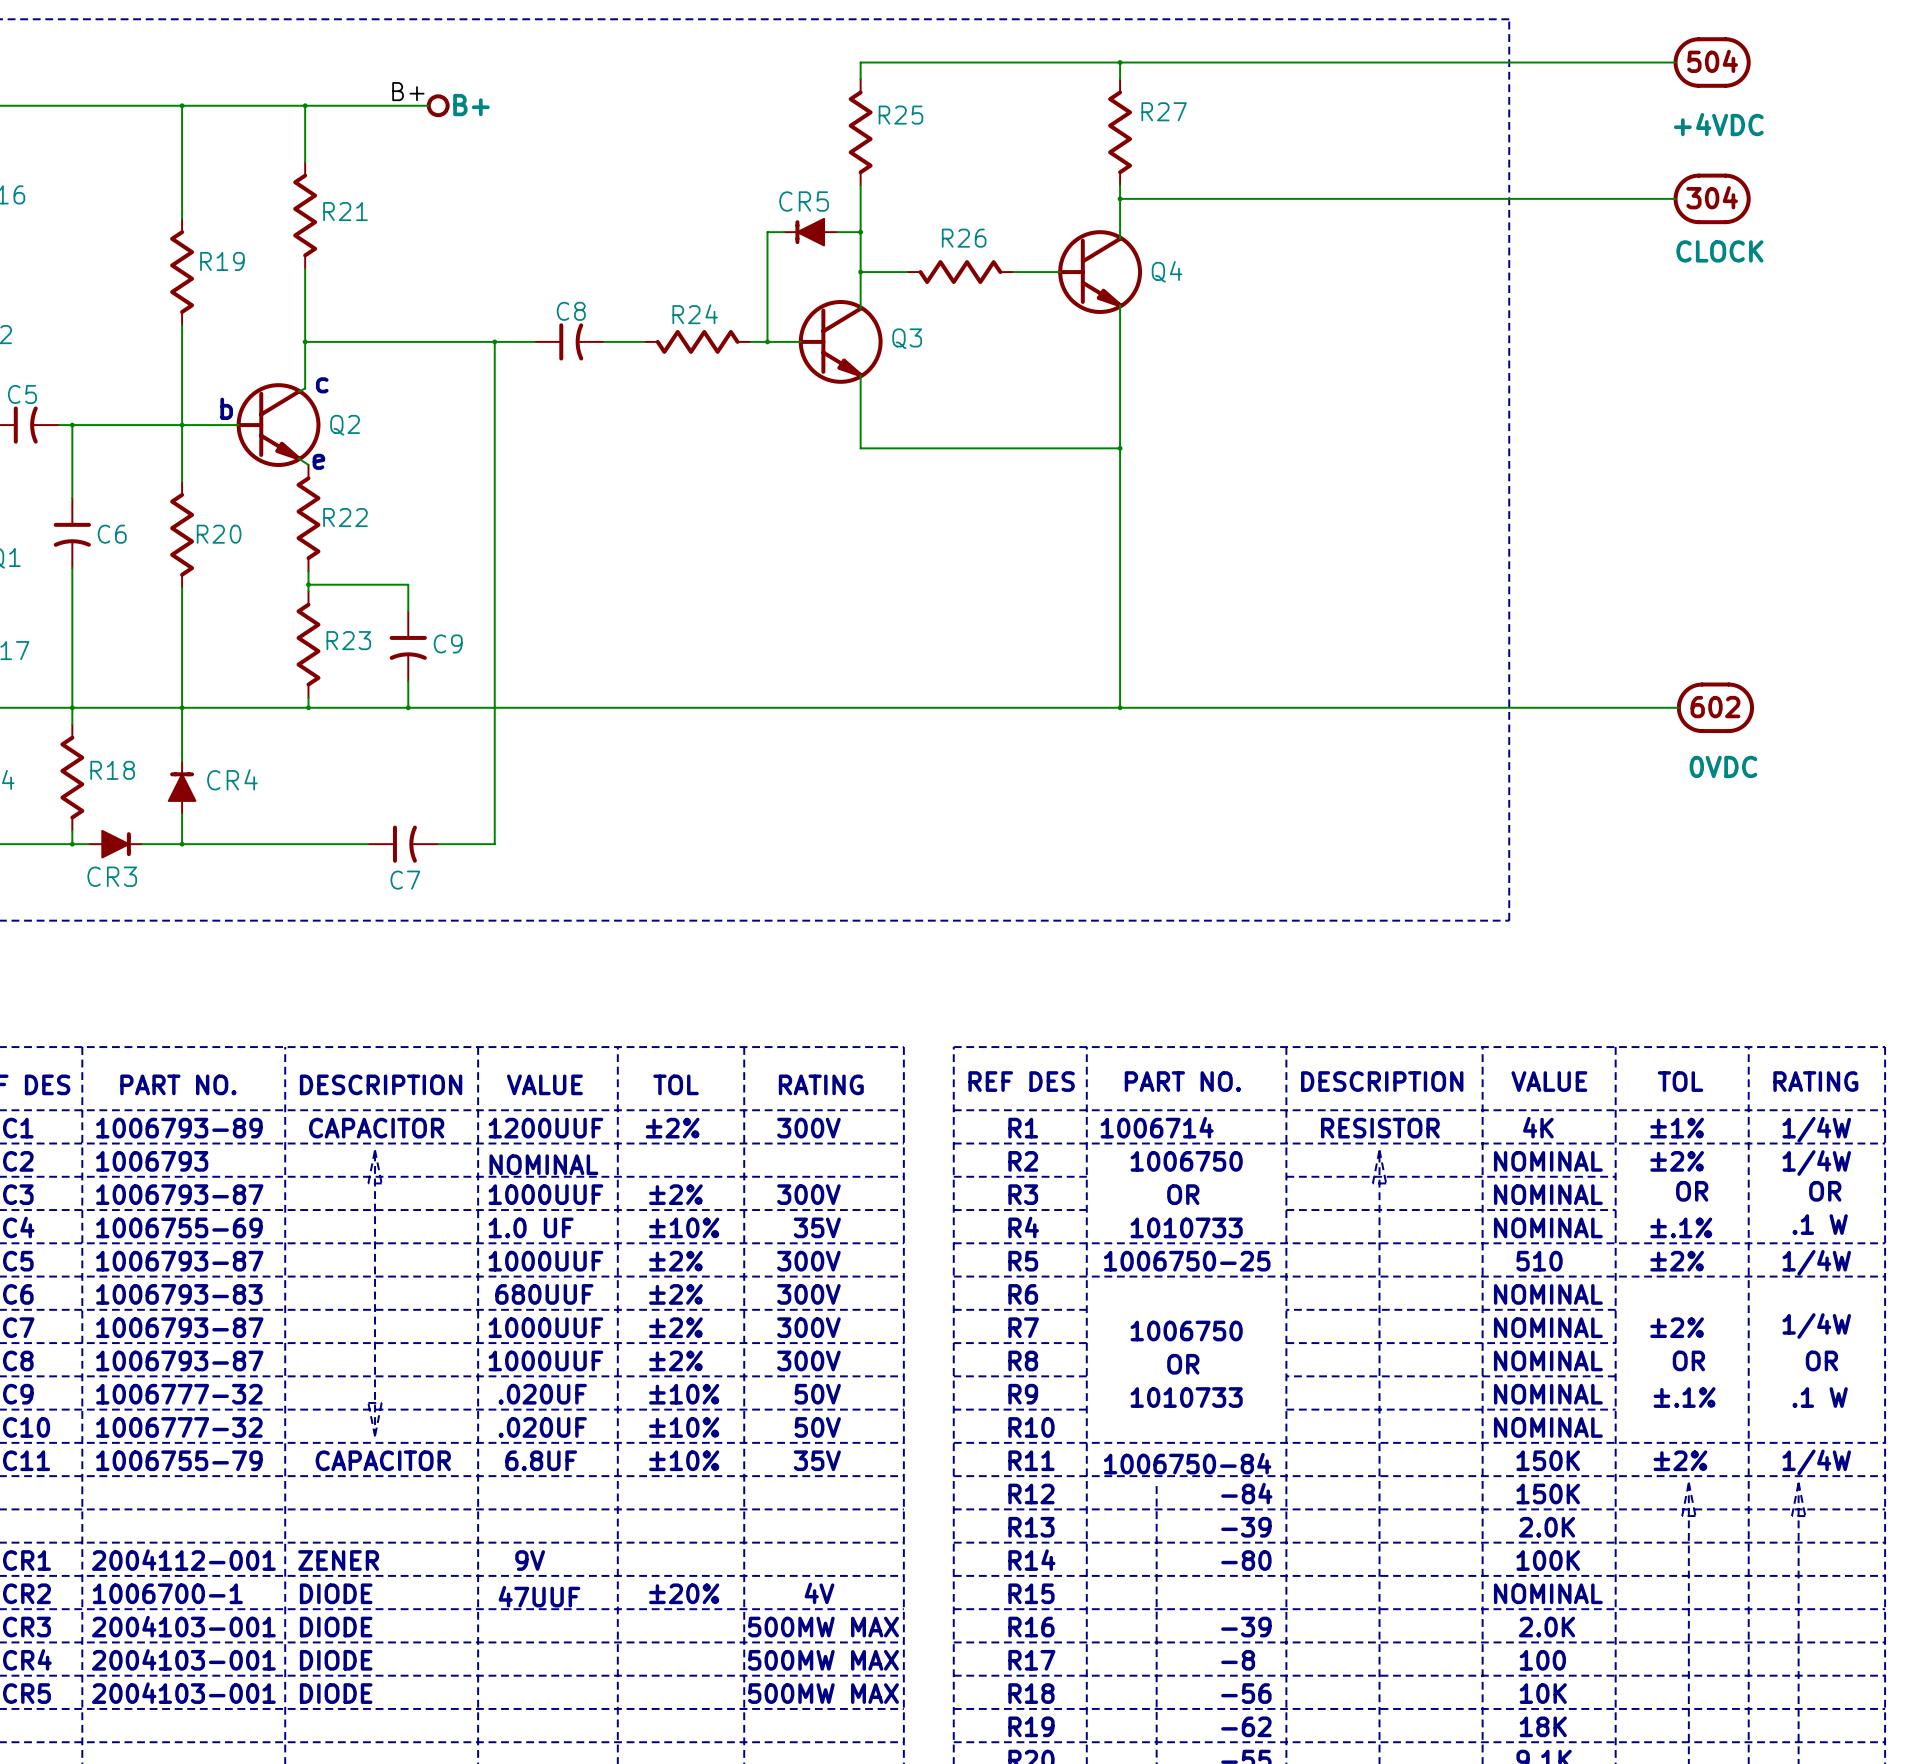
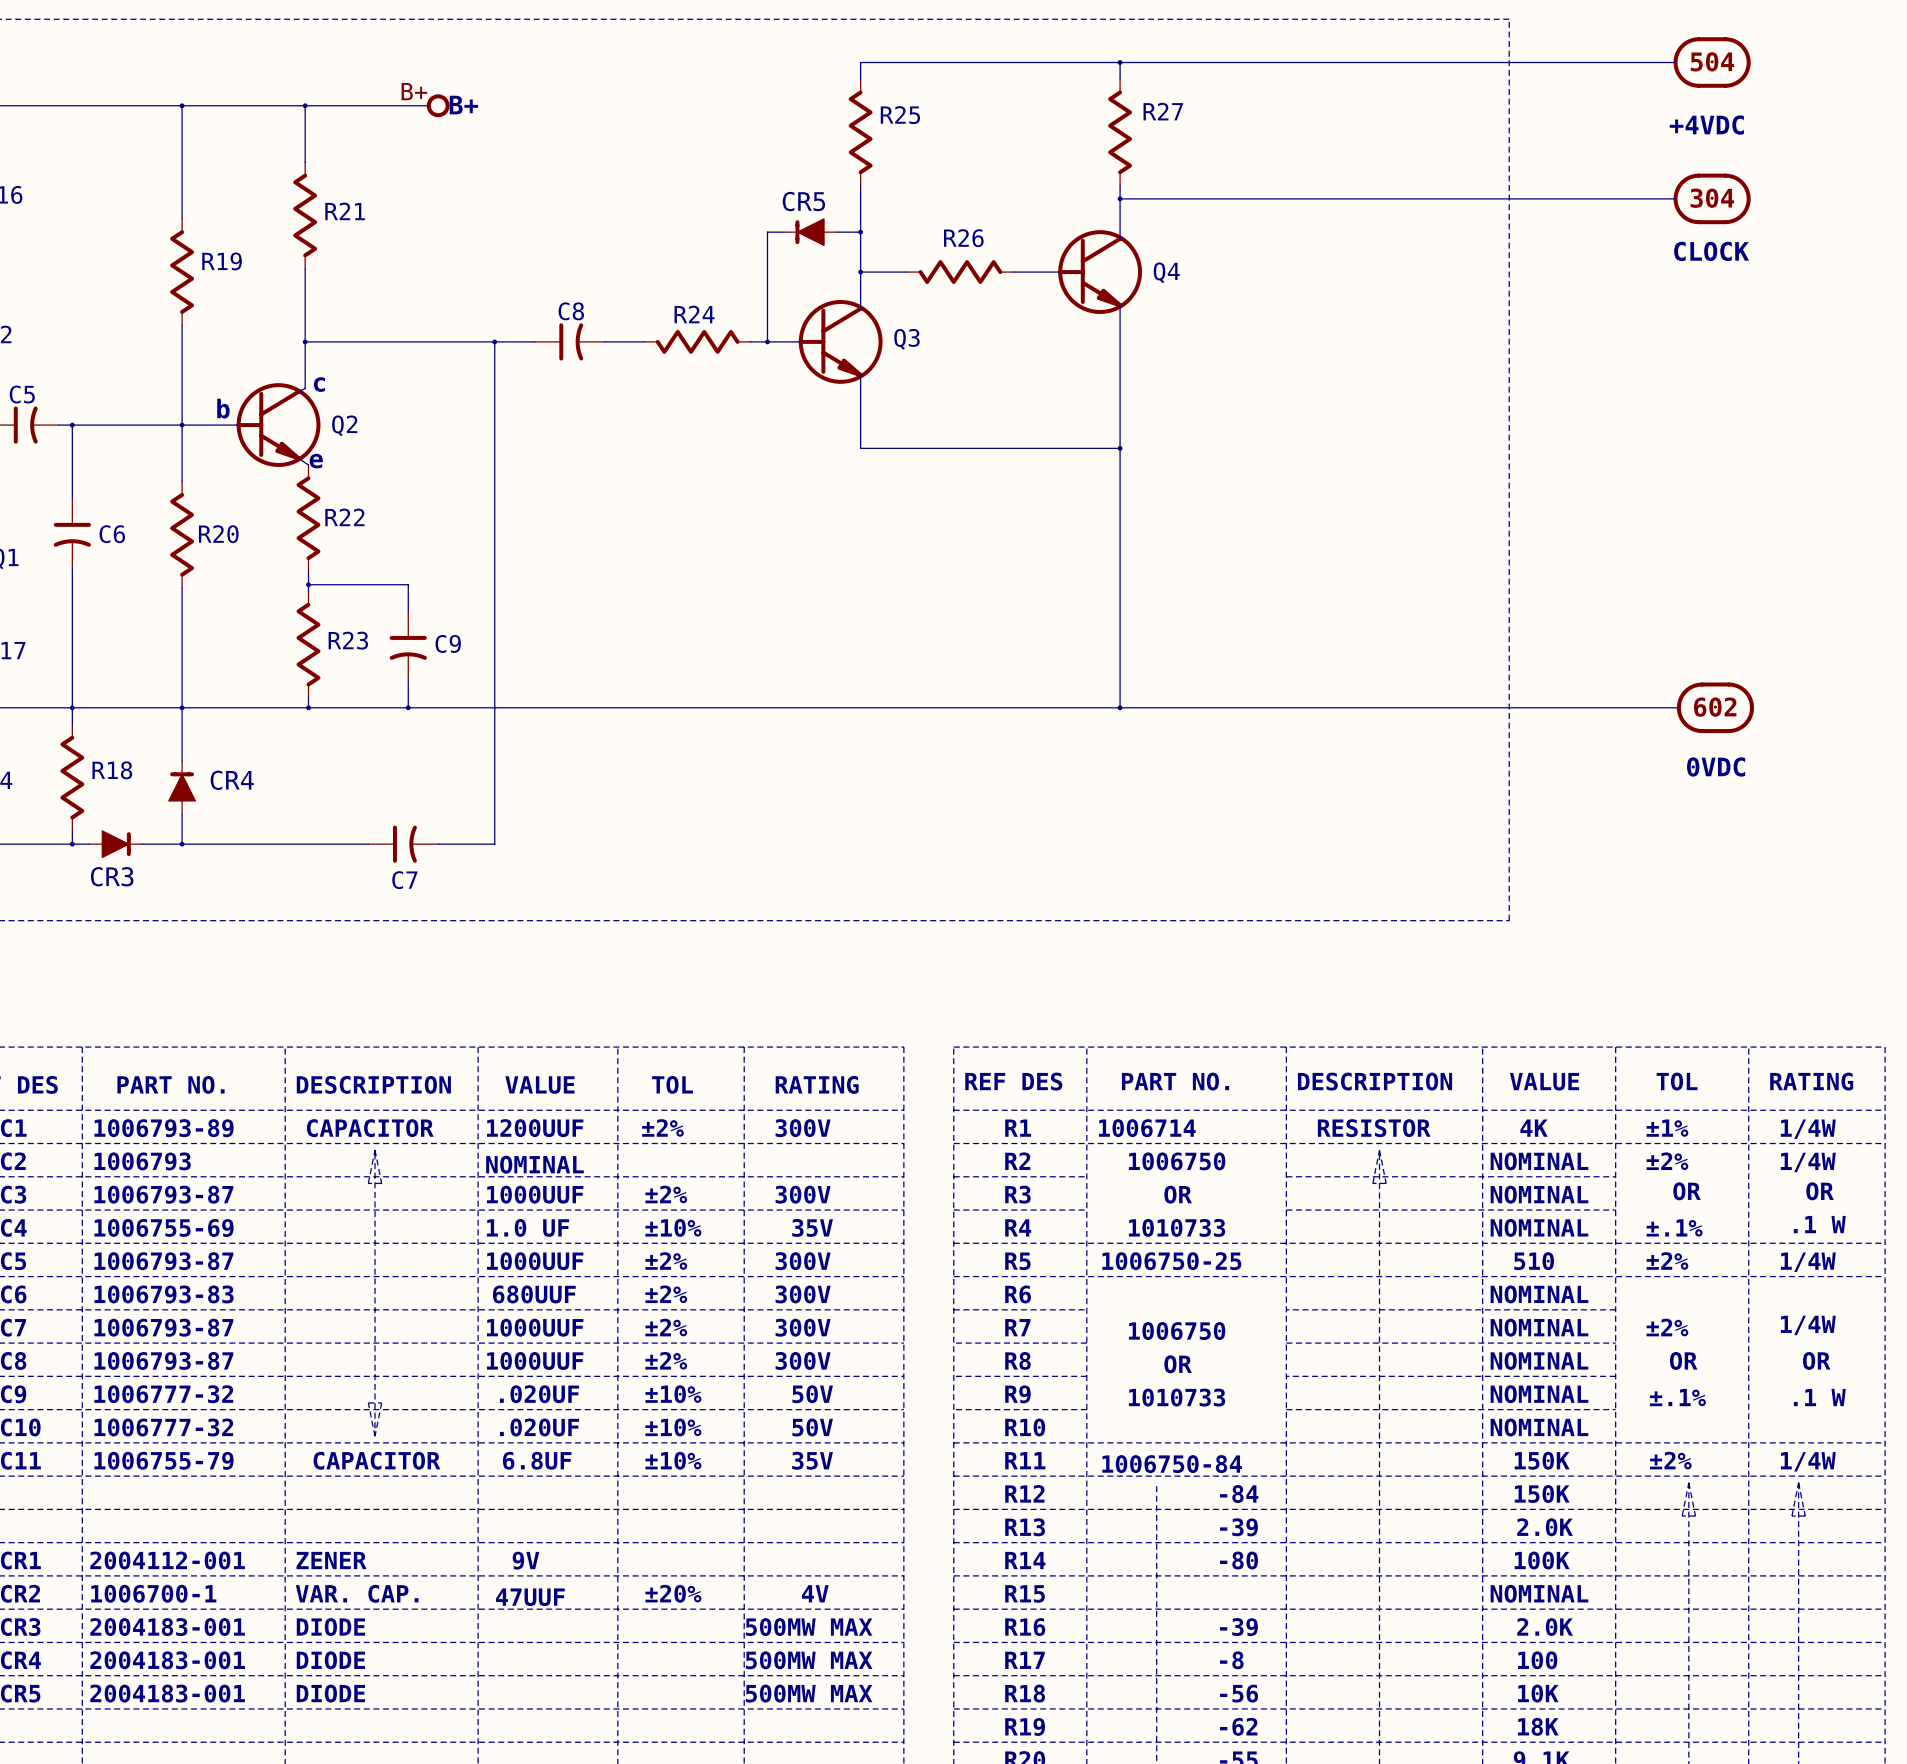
text: DIODE (336, 1593) -> VAR. CAP. (357, 1593)
text: 2004103-001 (183, 1626) -> 2004183-001 (167, 1627)
text: 2004103-001 (183, 1659) -> 2004183-001 (167, 1660)
text: 2004103-001 (183, 1693) -> 2004183-001 (167, 1693)

